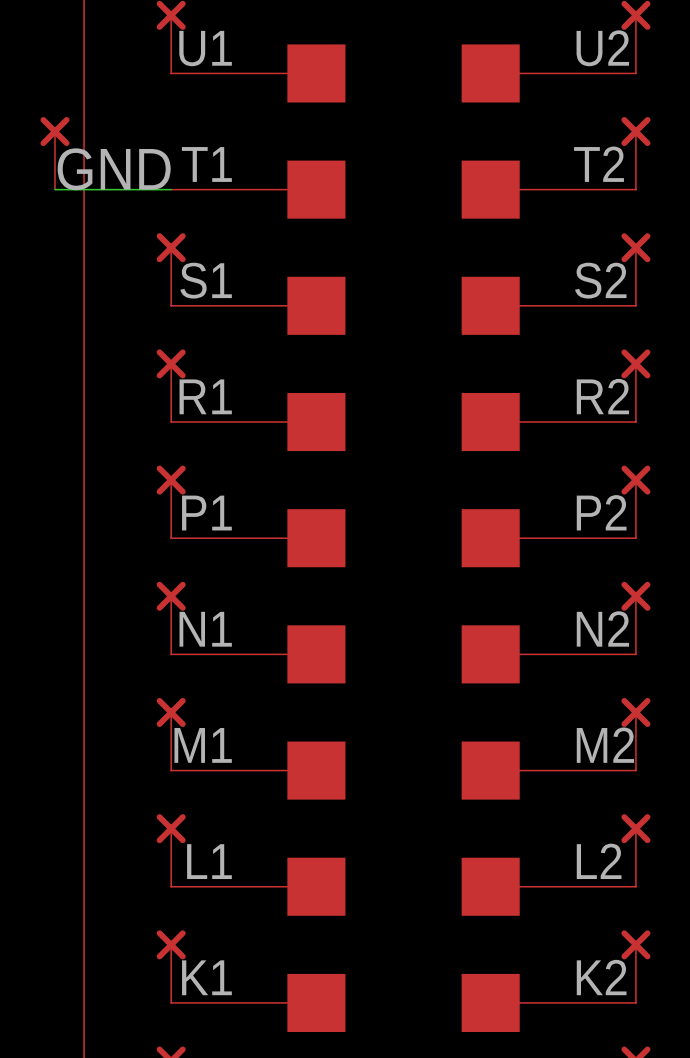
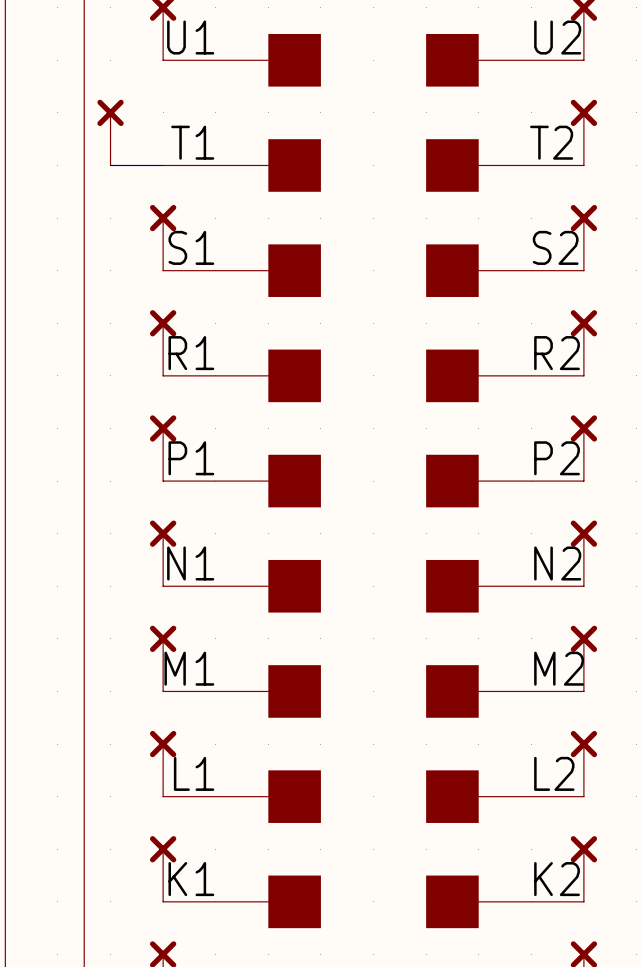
part position: (54, 153) -> (110, 132)
label: GND (114, 169) -> none
wire: (54, 189) (113, 189) -> none

